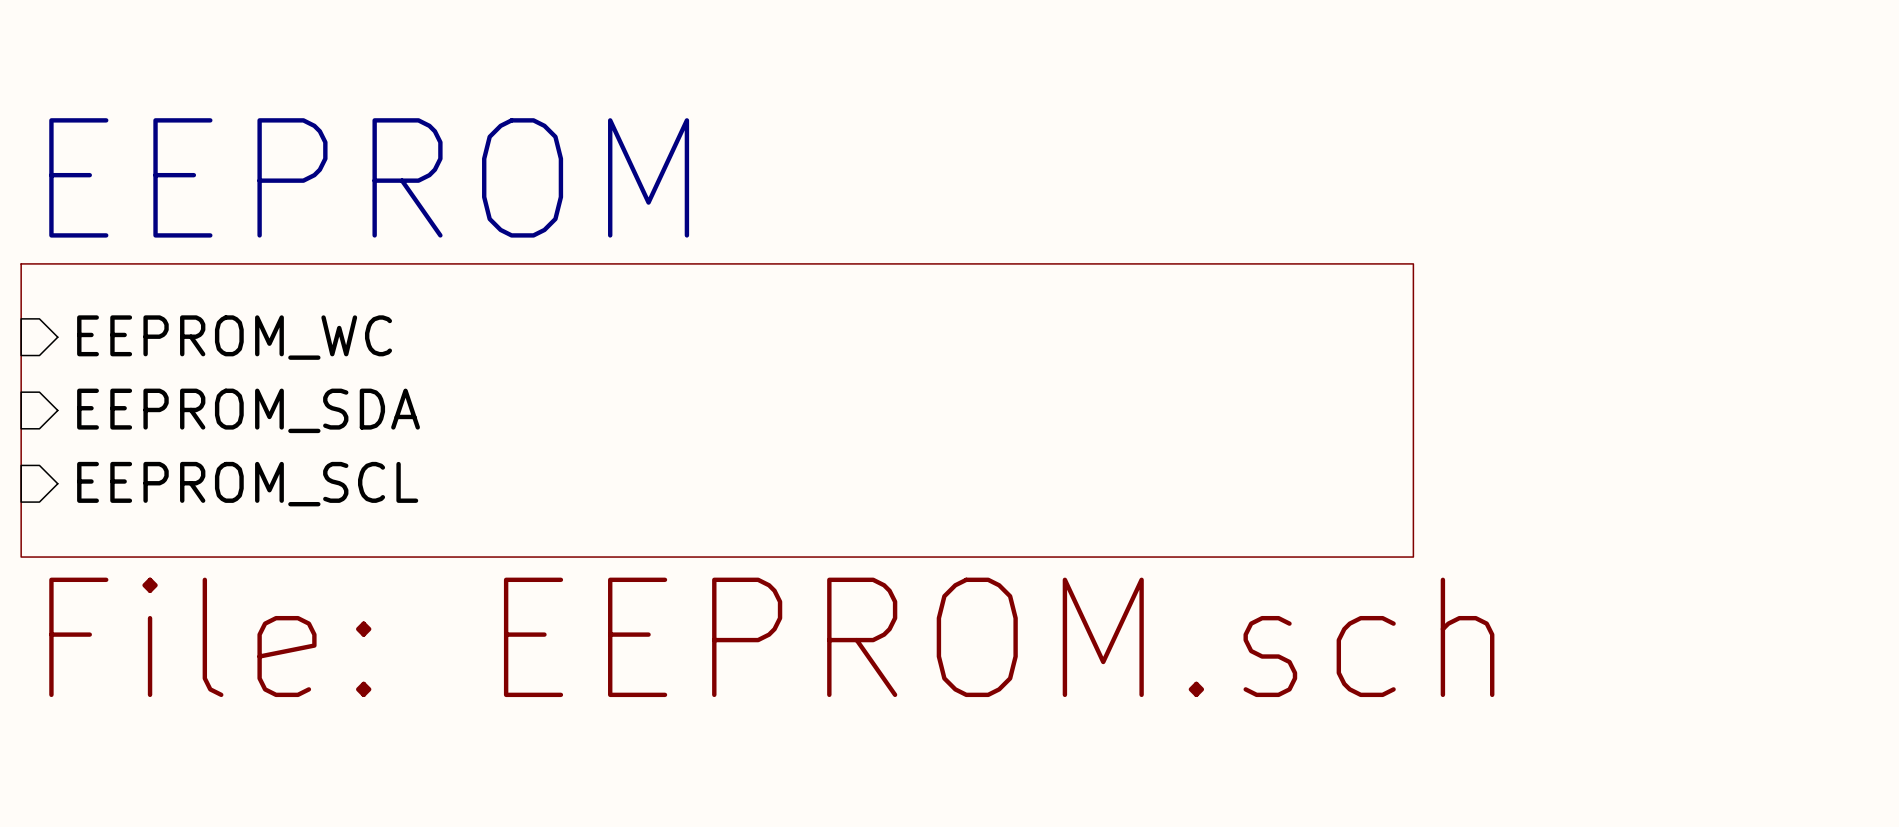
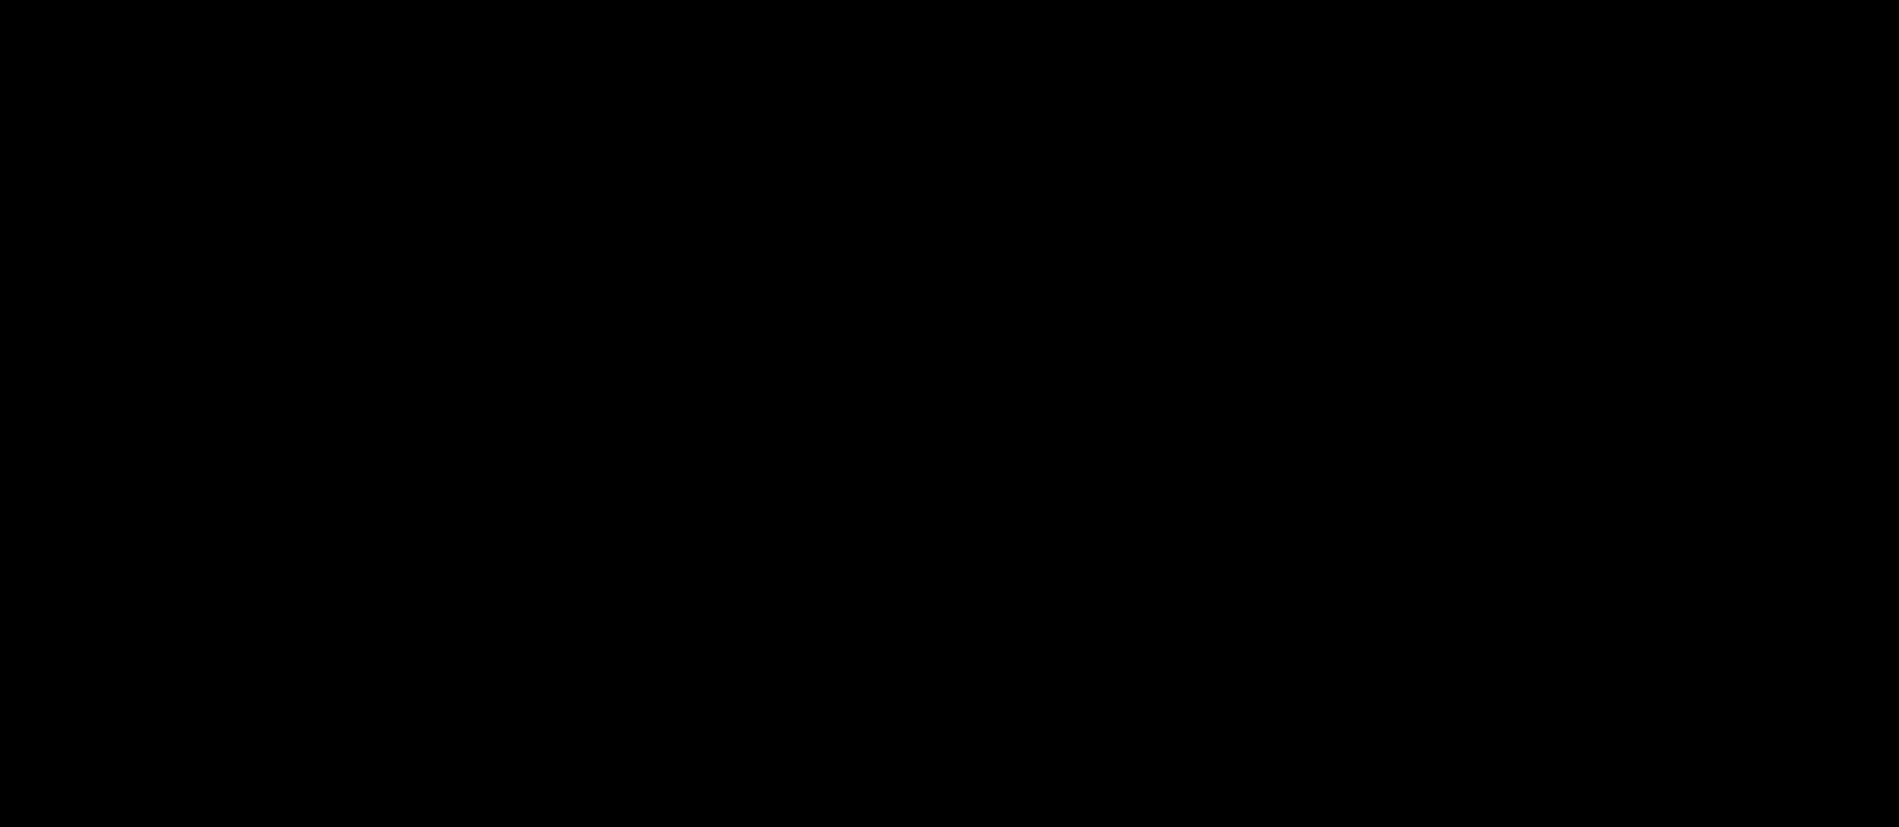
sheet pin: EEPROM_WC (234, 337) -> none
sheet pin: EEPROM_SDA (248, 410) -> none
sheet EEPROM: File: EEPROM.sch (717, 410) -> none
sheet pin: EEPROM_SCL (247, 484) -> none

